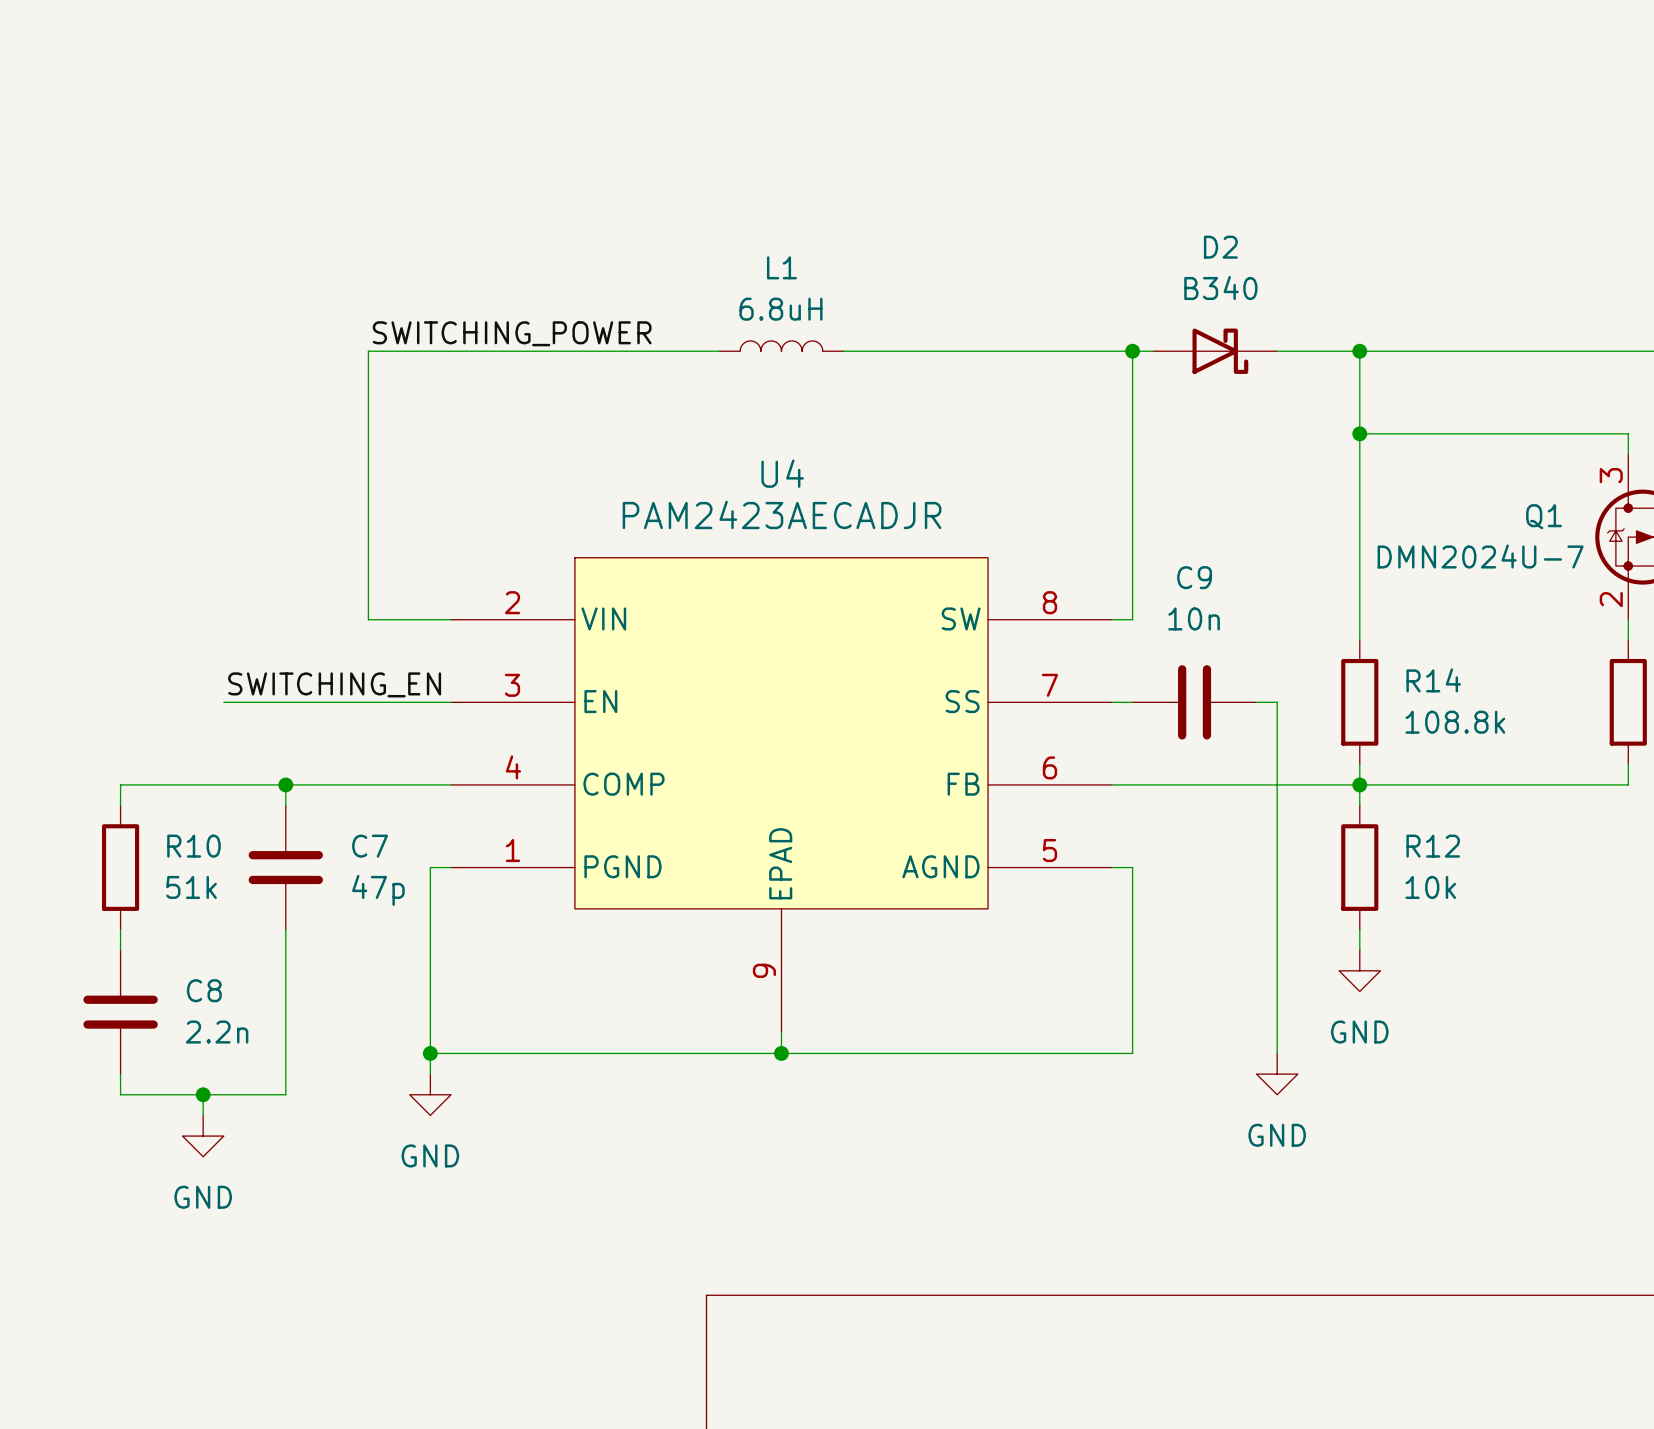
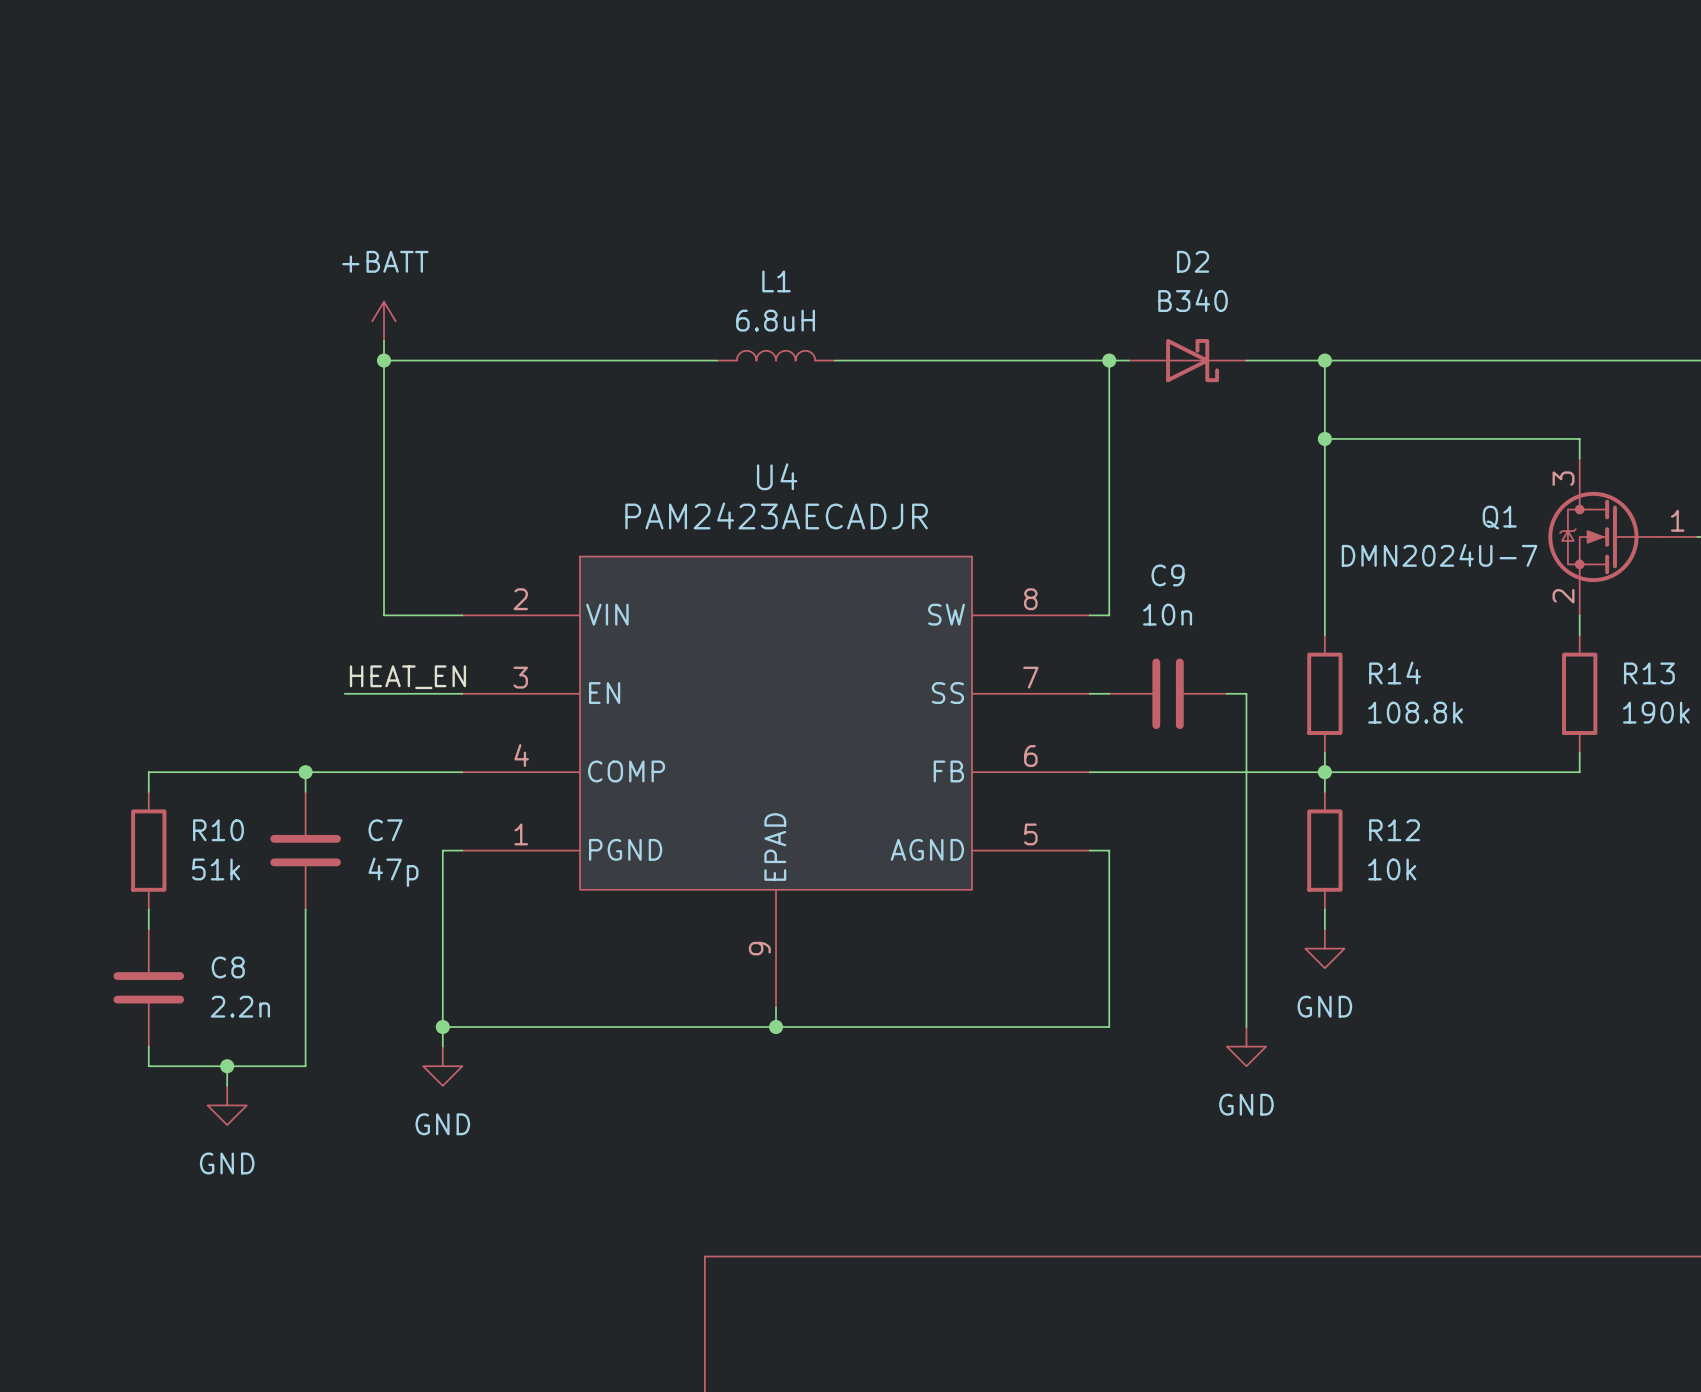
power symbol: none -> +BATT (383, 321)
wire: none -> (383, 340) (383, 360)
label: SWITCHING_POWER (512, 333) -> none
junction: none -> (383, 360)
label: SWITCHING_EN (334, 684) -> none
label: none -> HEAT_EN (407, 677)
wire: (223, 702) (327, 702) -> none

